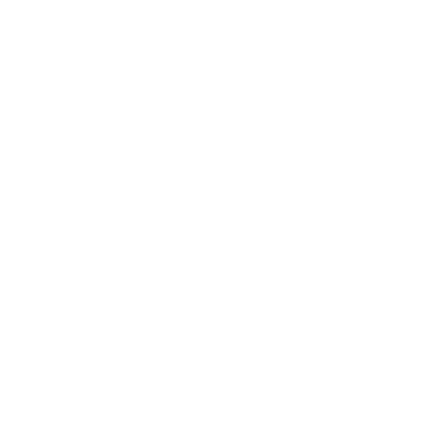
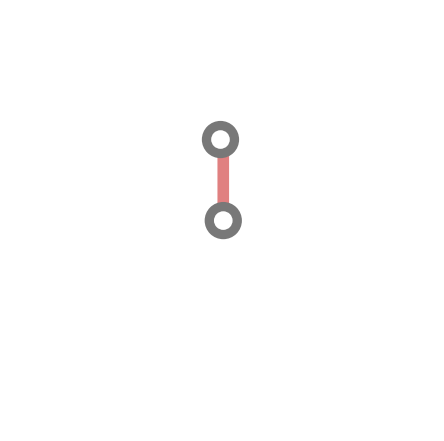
track: none -> (220, 139) (223, 142) (223, 220)
via: none -> (220, 139)
via: none -> (223, 220)

